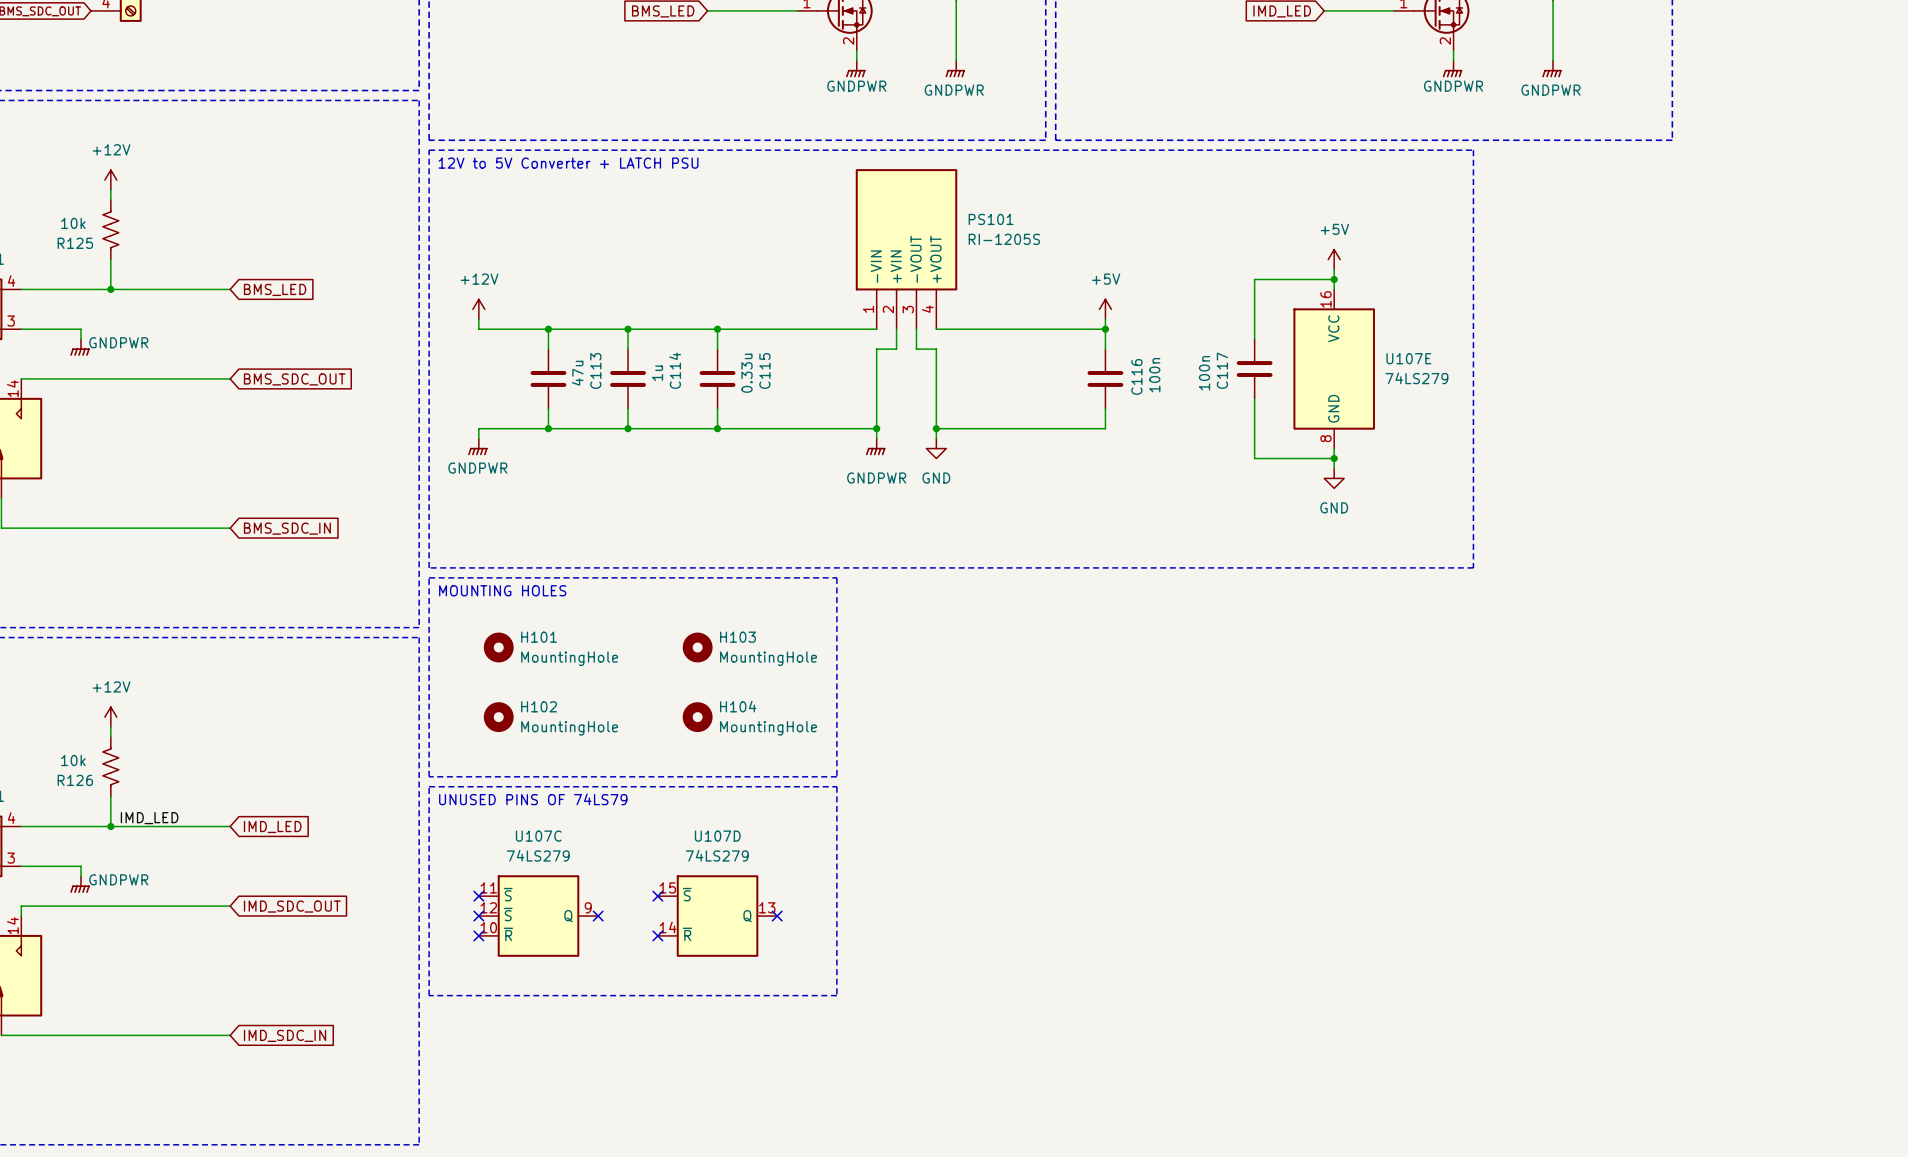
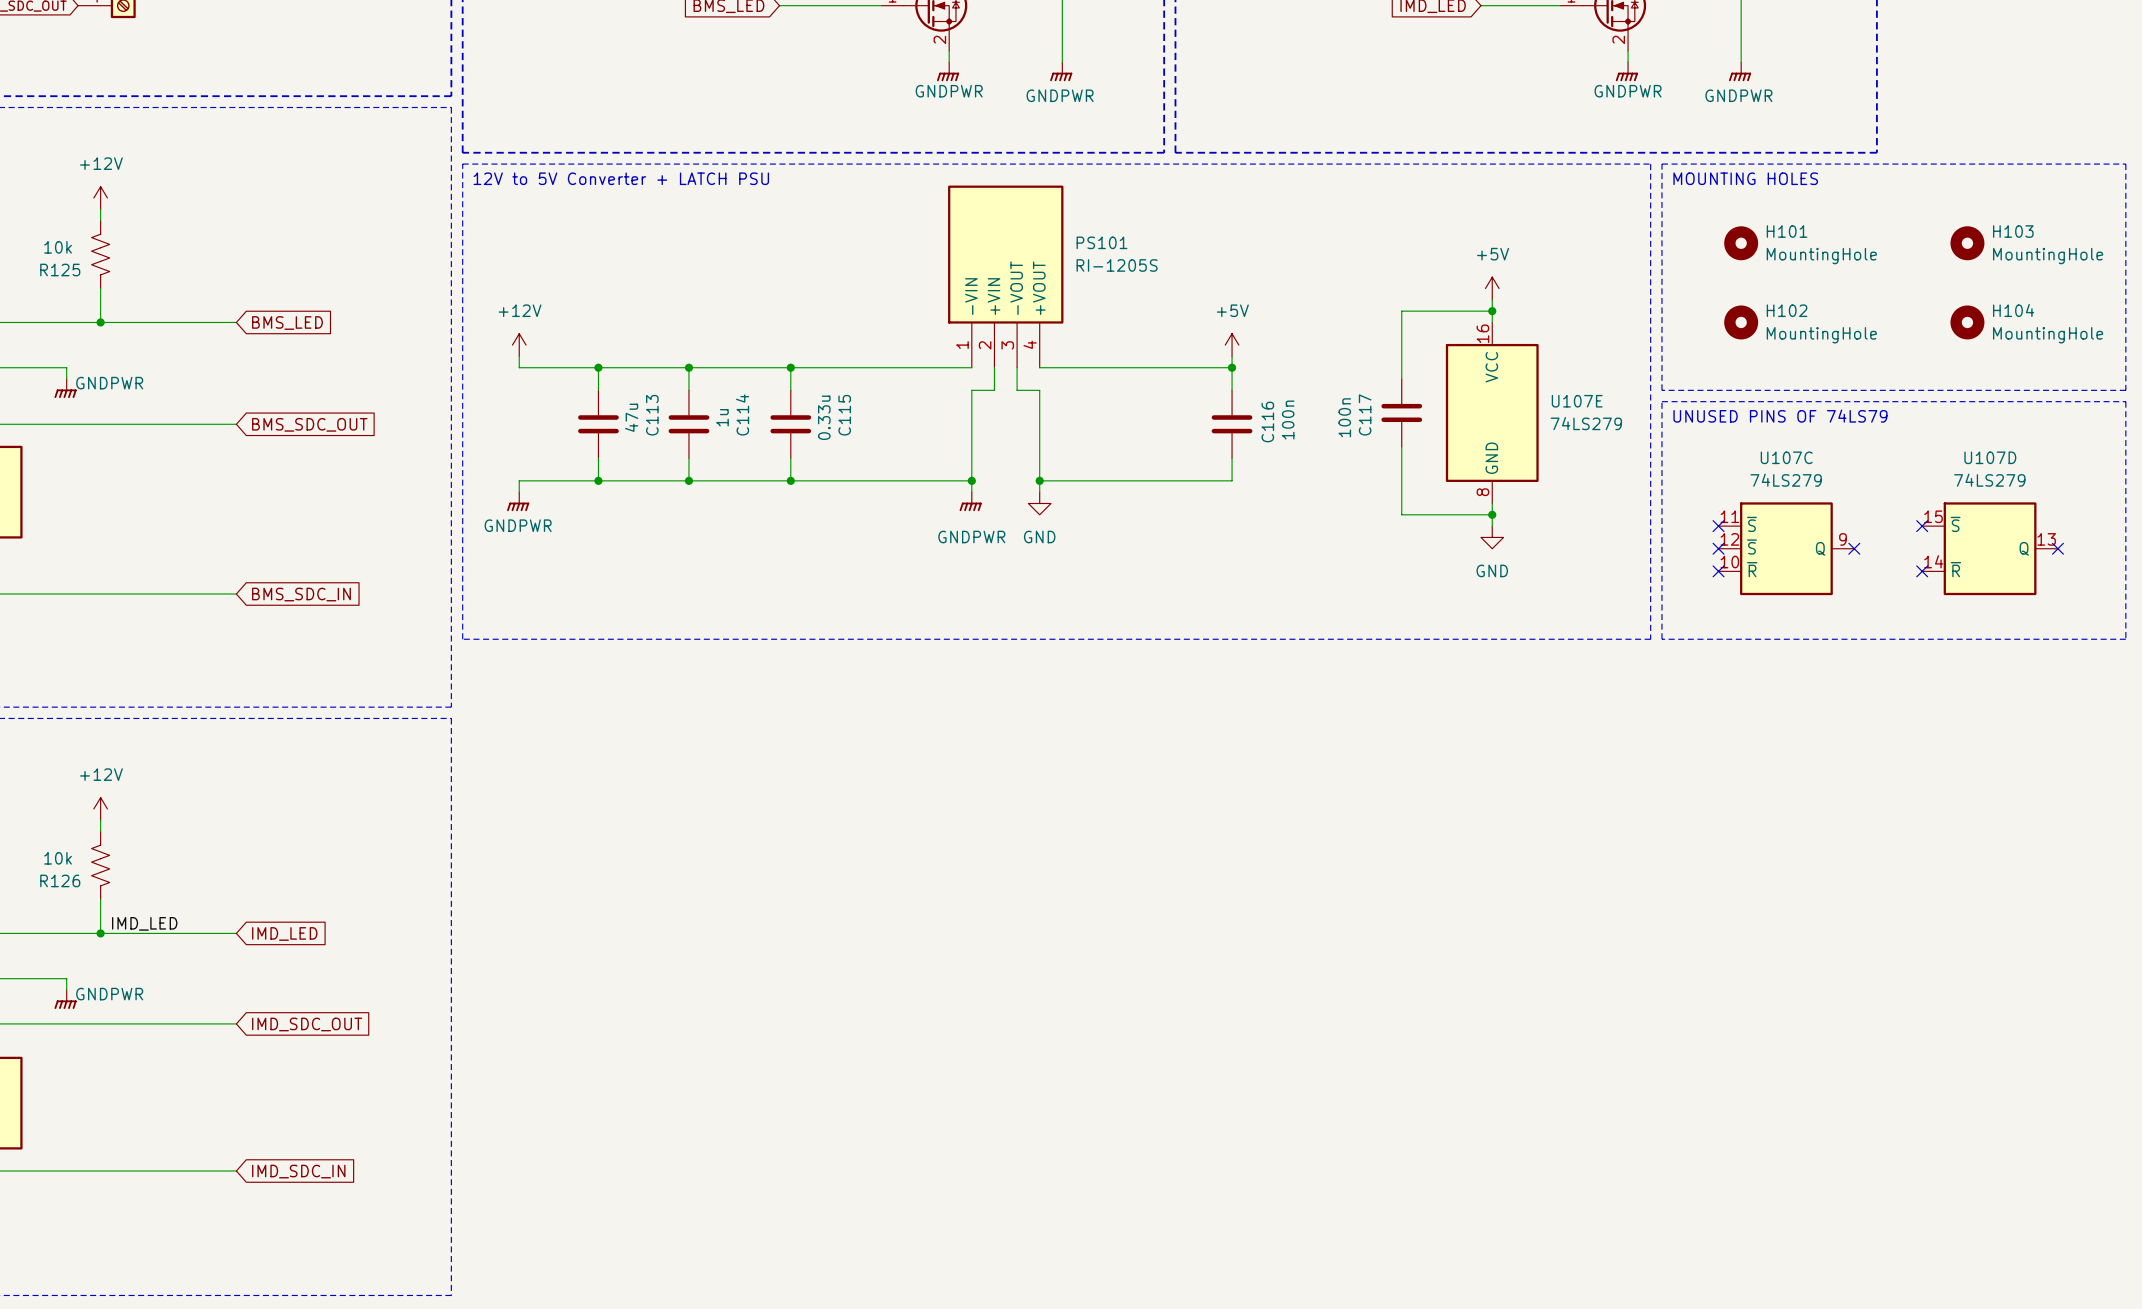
line: none -> (1661, 164) (1661, 390) (2125, 390) (2125, 164) (1661, 164)
text: none -> MOUNTING HOLES (1745, 178)
line: none -> (1661, 401) (2125, 401) (2125, 639) (1661, 639) (1661, 401)
text: none -> UNUSED PINS OF 74LS79 (1780, 416)
no-connect mark: none -> (1718, 526)
no-connect mark: none -> (1922, 526)
no-connect mark: none -> (1718, 548)
no-connect mark: none -> (1854, 548)
no-connect mark: none -> (2057, 548)
no-connect mark: none -> (1718, 571)
no-connect mark: none -> (1922, 571)
line: (429, 577) (429, 776) (836, 776) (836, 577) (429, 577) -> none
text: MOUNTING HOLES (502, 590) -> none
H101 position: (498, 647) -> (1741, 243)
H103 position: (697, 647) -> (1967, 243)
H102 position: (498, 717) -> (1741, 322)
H104 position: (697, 717) -> (1967, 322)
line: (429, 786) (836, 786) (836, 995) (429, 995) (429, 786) -> none
text: UNUSED PINS OF 74LS79 (533, 799) -> none
no-connect mark: (478, 896) -> none
no-connect mark: (657, 896) -> none
no-connect mark: (478, 916) -> none
U107C position: (538, 916) -> (1786, 548)
no-connect mark: (598, 916) -> none
U107D position: (717, 916) -> (1990, 548)
no-connect mark: (777, 916) -> none
no-connect mark: (478, 935) -> none
no-connect mark: (657, 935) -> none

